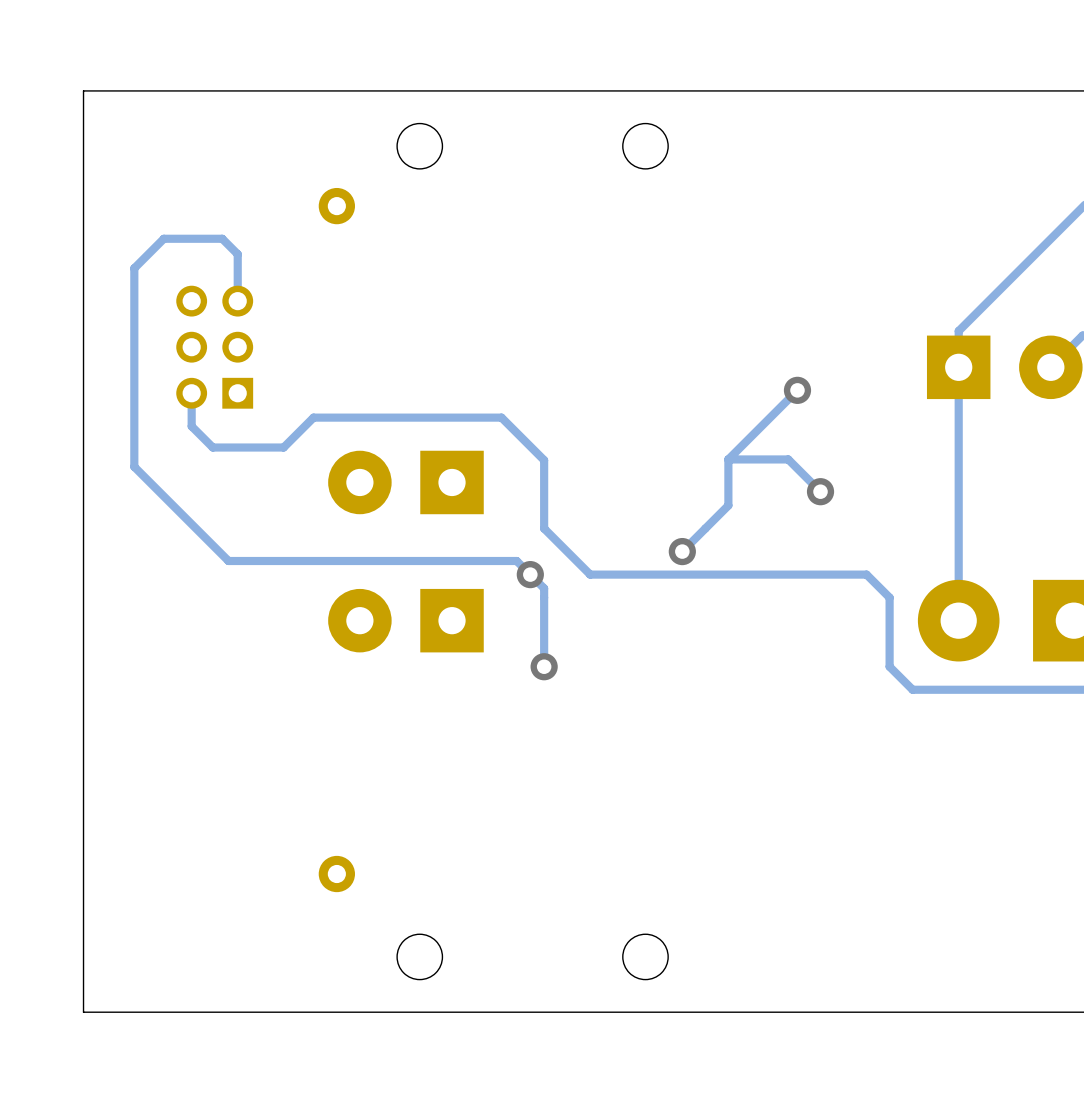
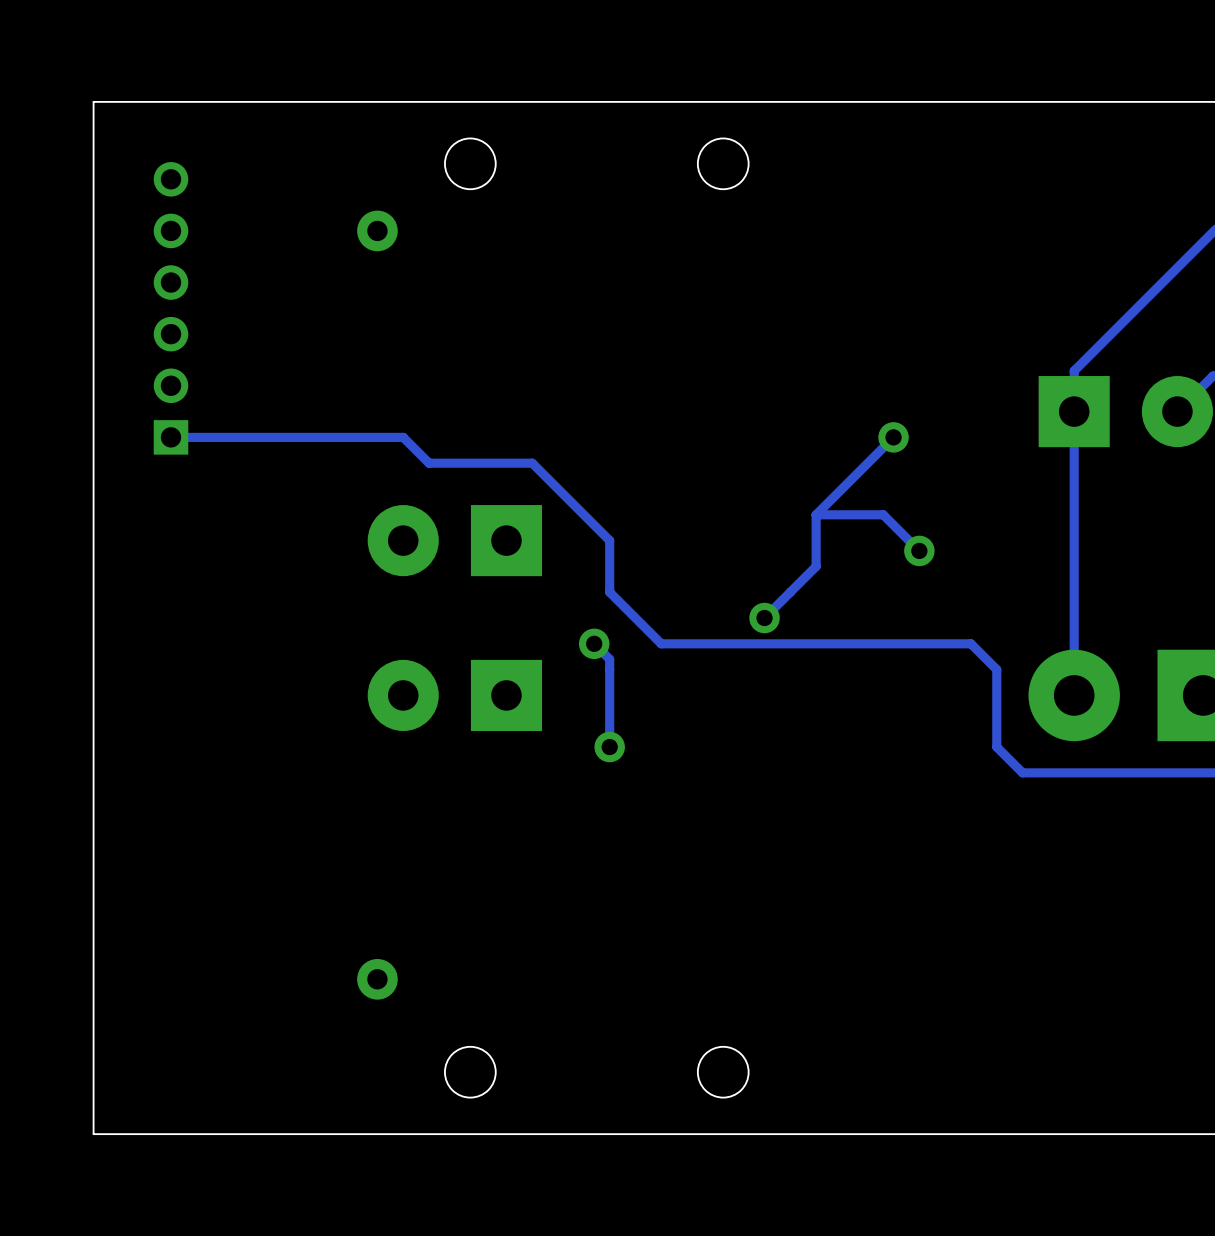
part: none -> (170, 308)
track: (237, 301) (237, 254) (222, 238) (163, 238) (134, 268) (134, 466) (228, 561) (516, 561) (530, 574) -> none
part: (214, 347) -> none
track: (191, 393) (191, 426) (212, 447) (283, 447) (313, 417) (501, 417) (544, 460) (544, 482) -> (170, 437) (403, 437) (429, 463) (532, 463) (609, 540)

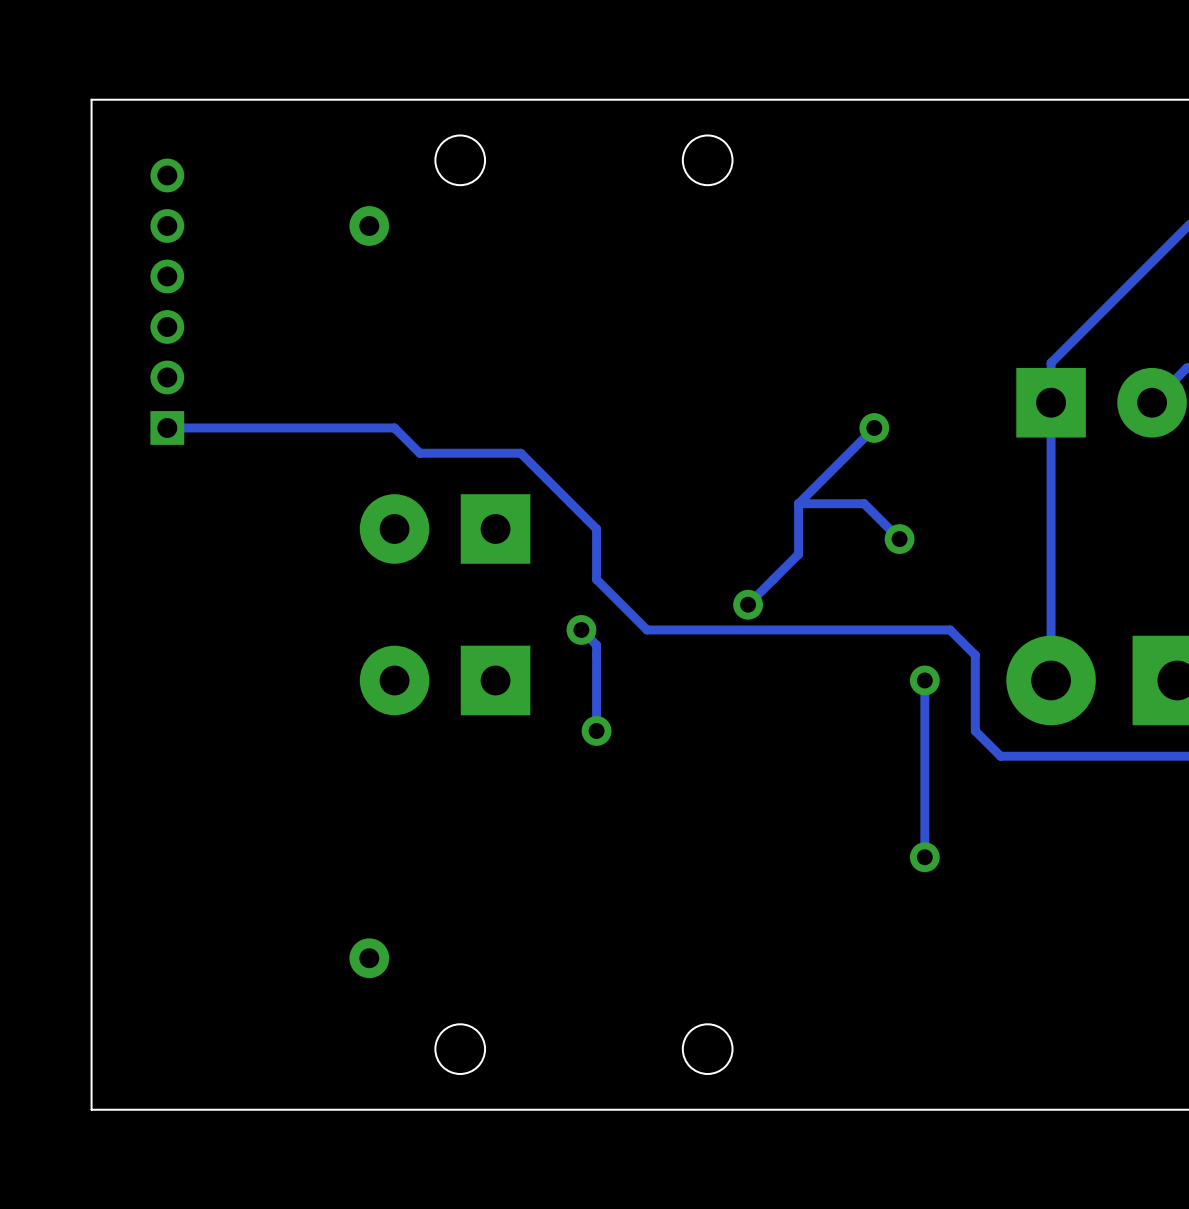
track: none -> (924, 680) (924, 857)
via: none -> (924, 680)
via: none -> (924, 857)

